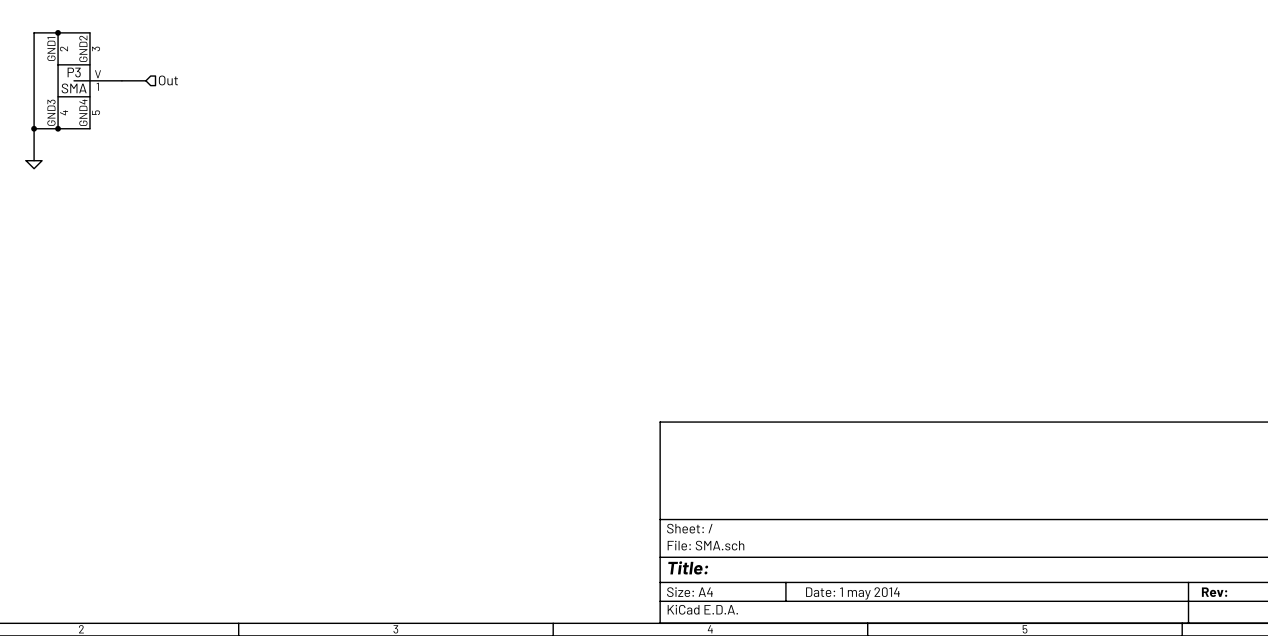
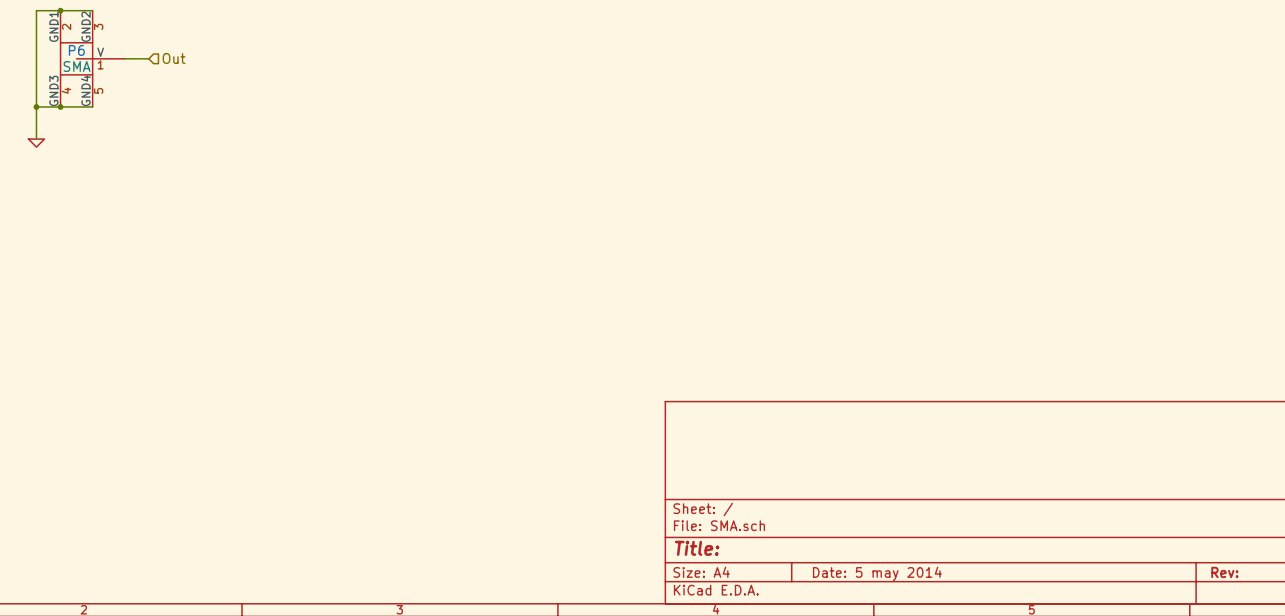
P3 name: P3 (74, 72) -> P6 (76, 50)
title block: Date: 1 may 2014 (852, 593) -> Date: 5 may 2014 (877, 573)

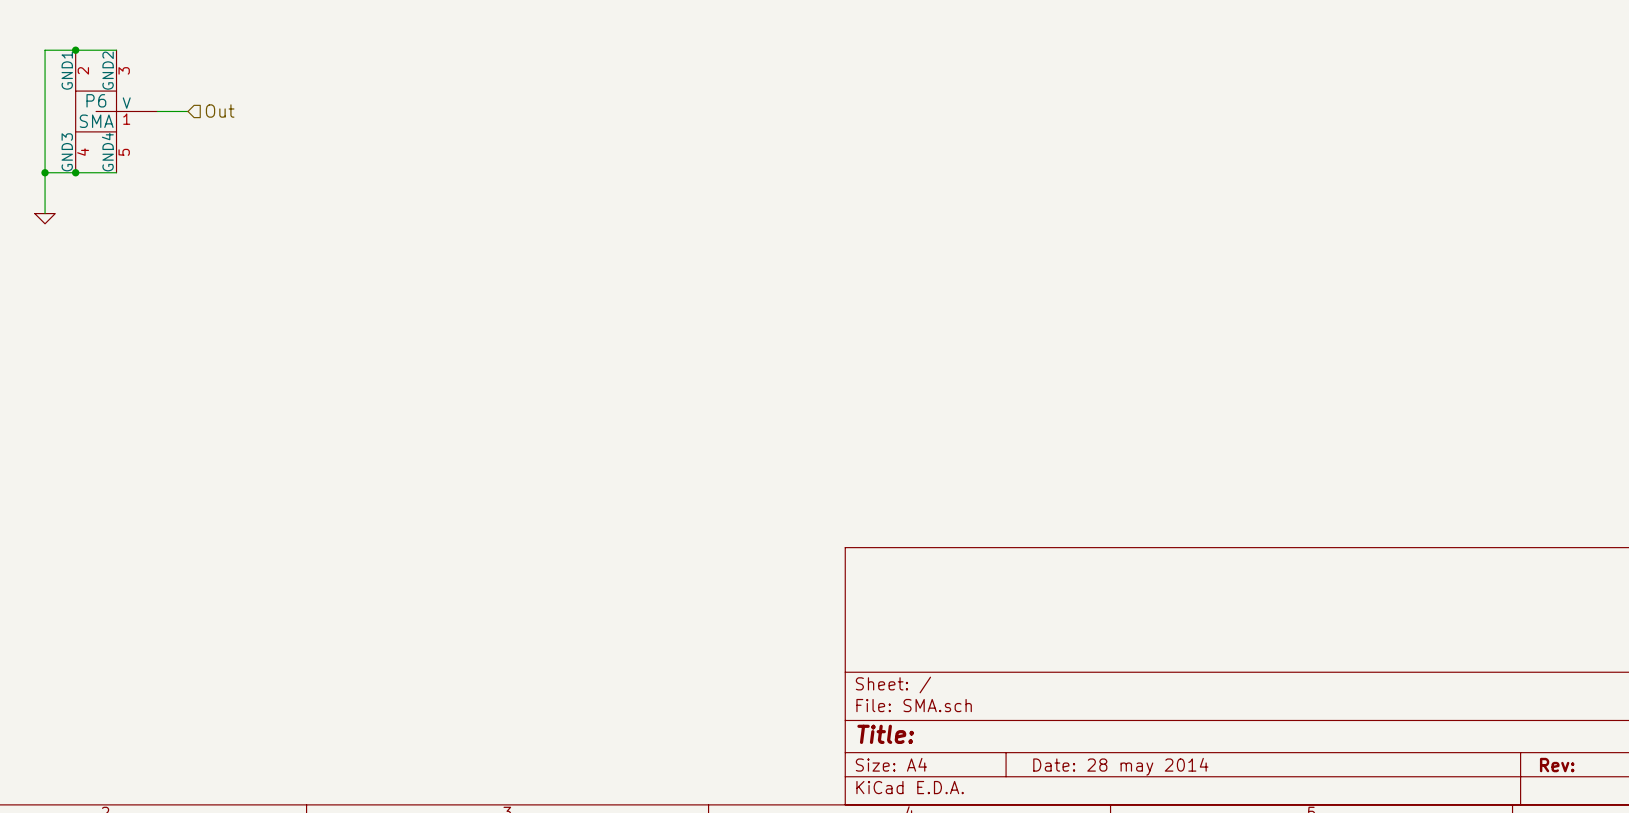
title block: Date: 5 may 2014 (877, 573) -> Date: 28 may 2014 (1120, 766)

